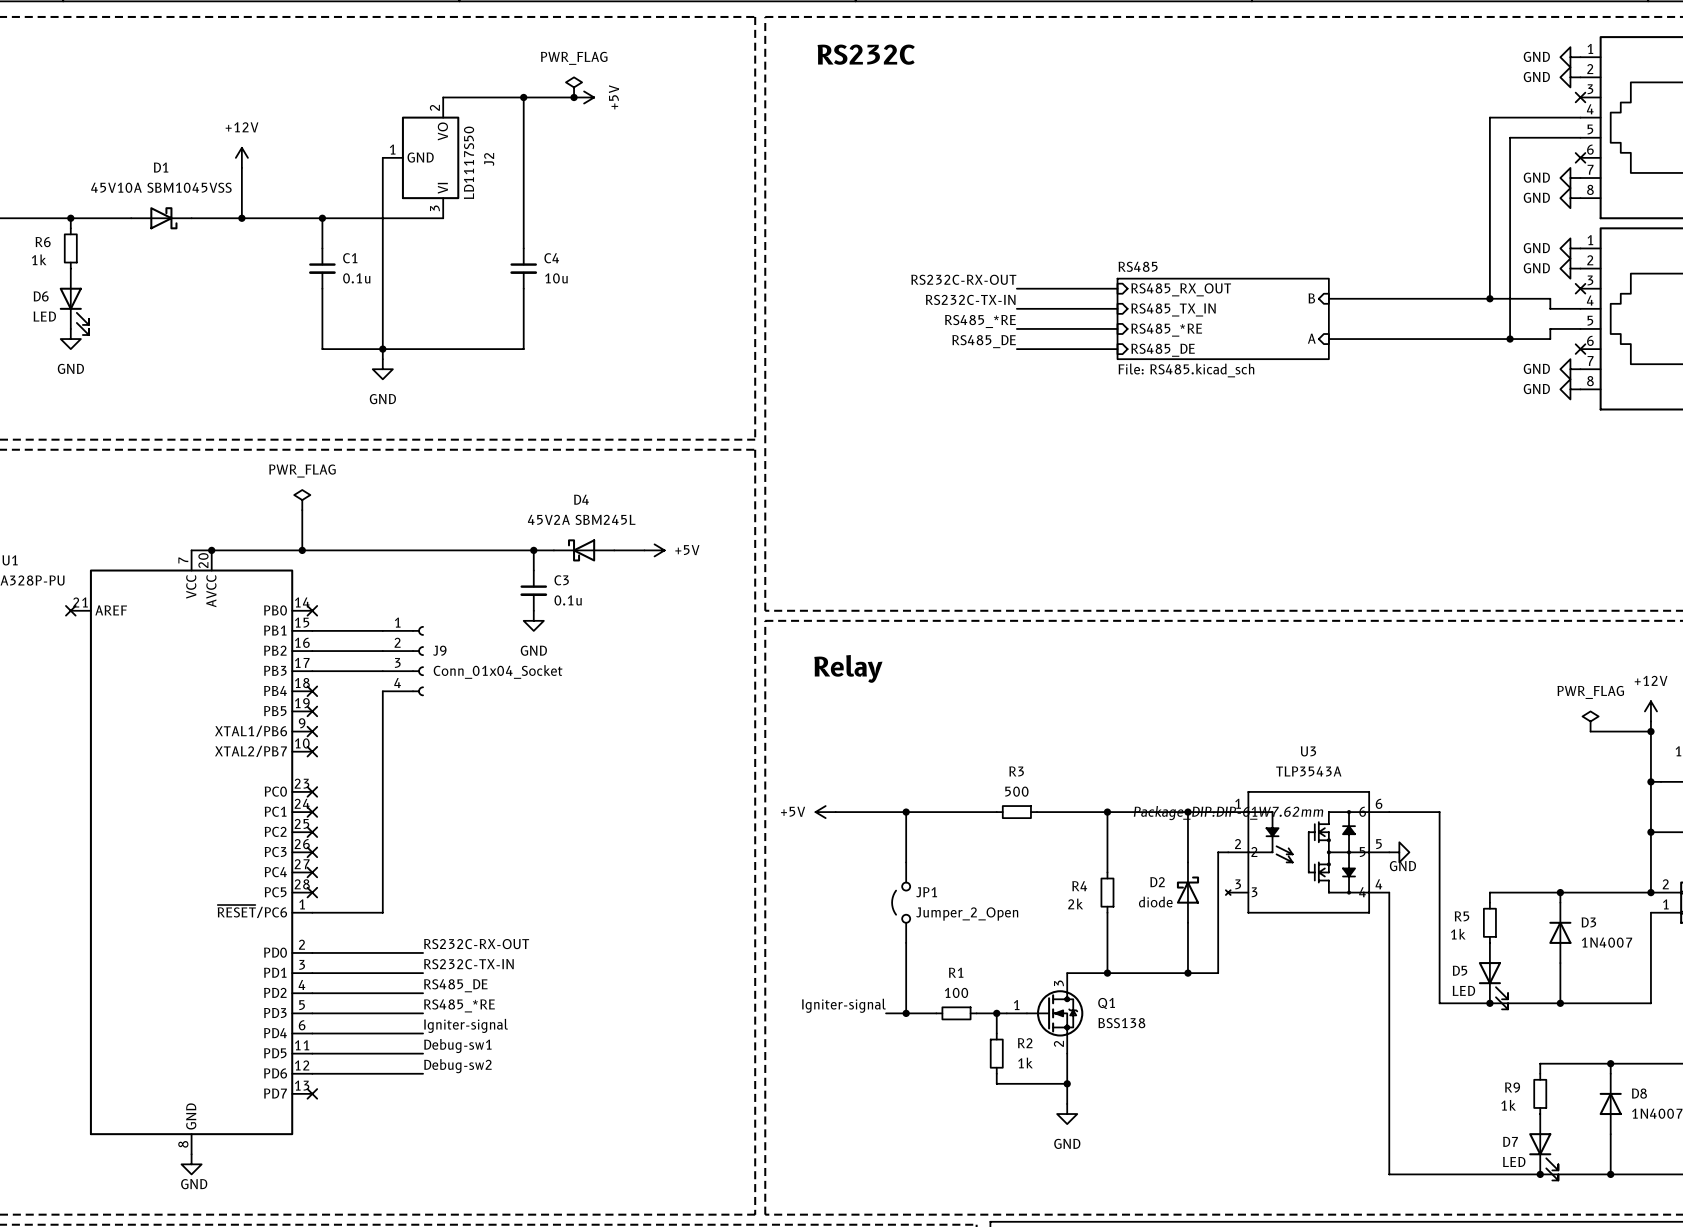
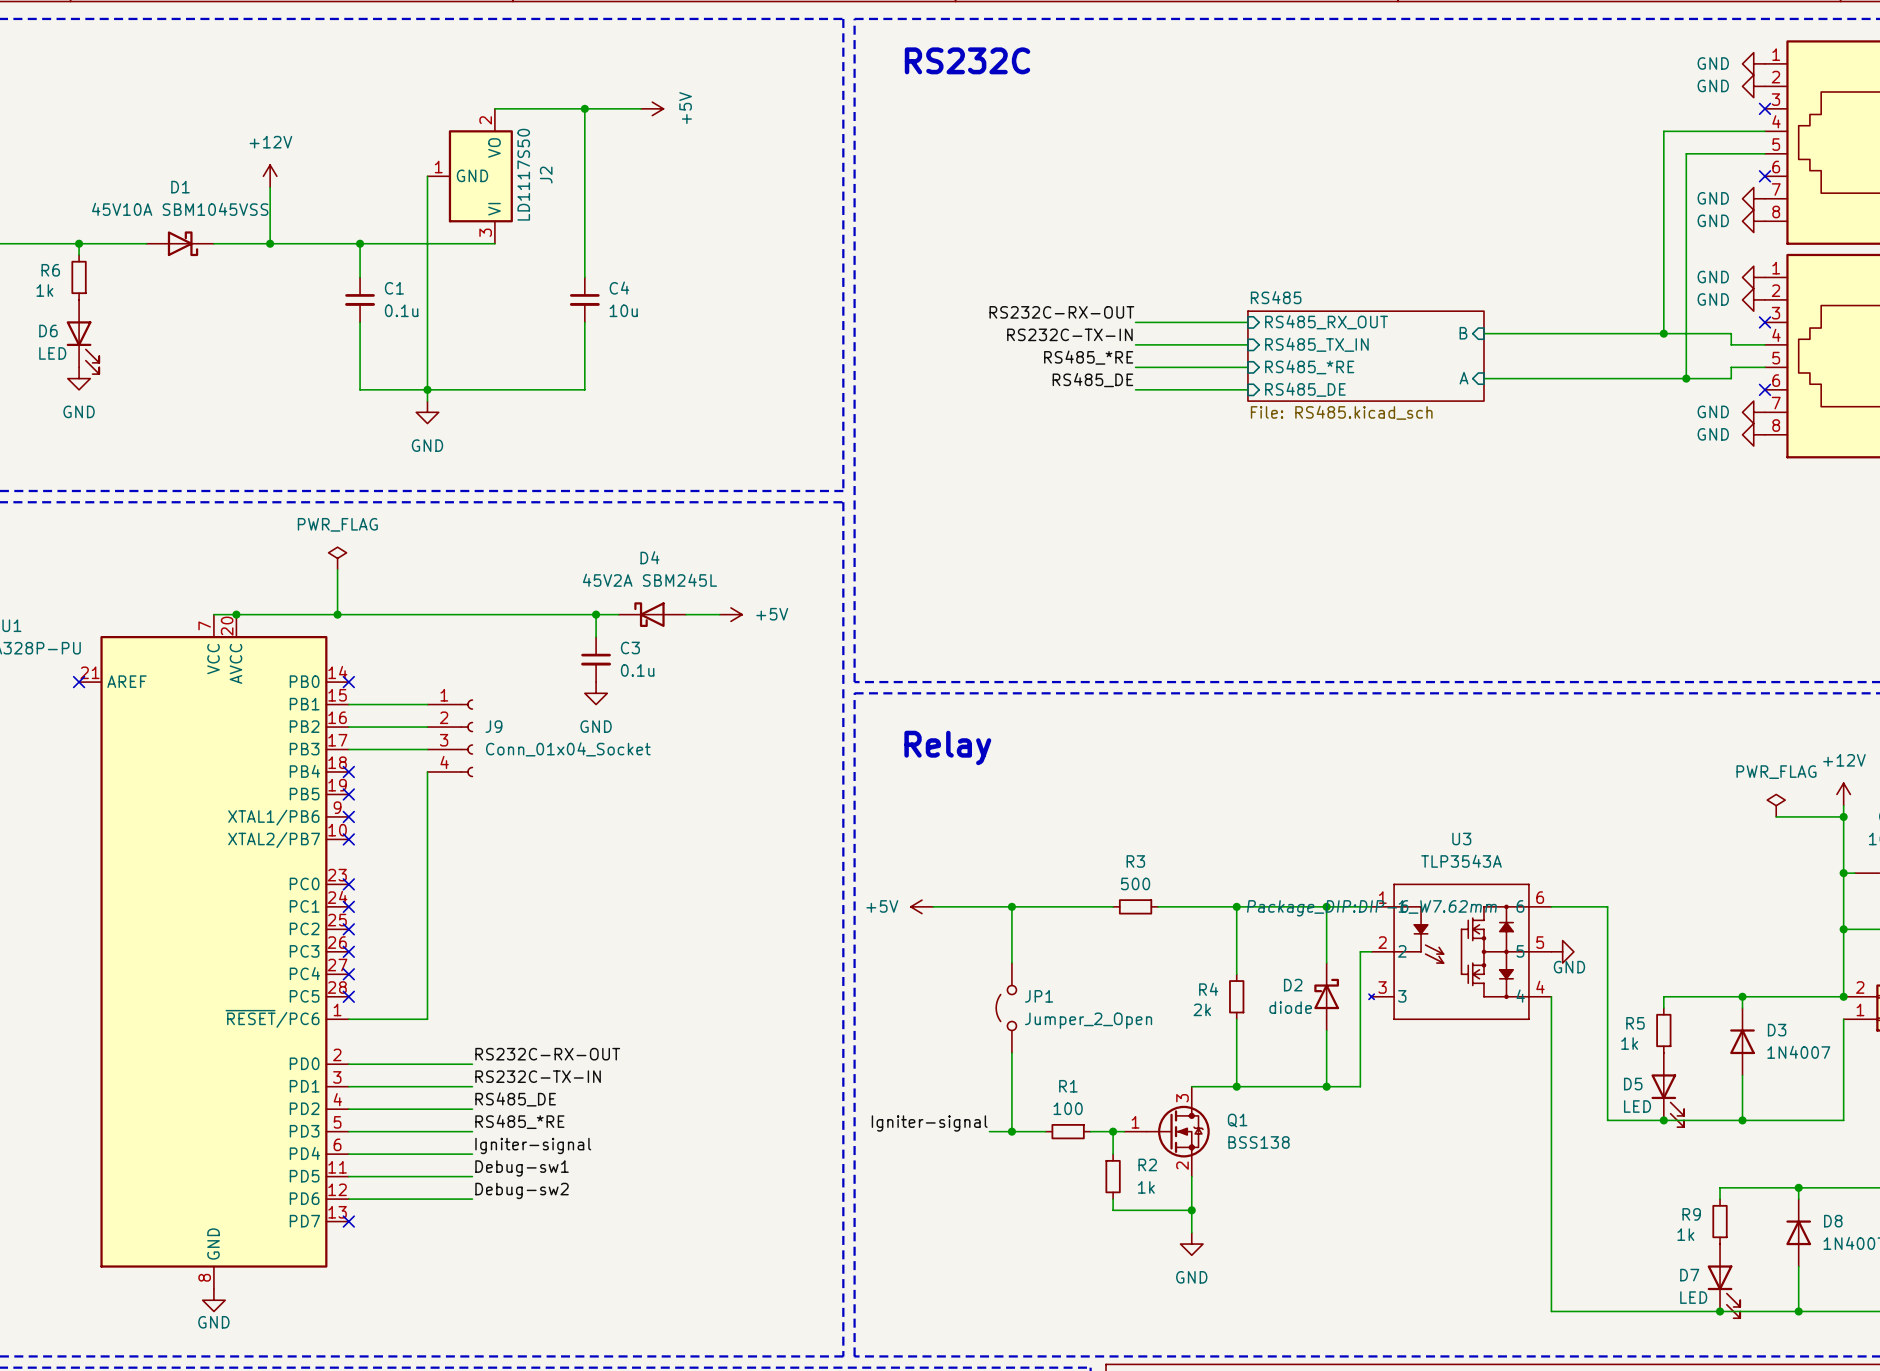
power symbol: PWR_FLAG (574, 87) -> none
junction: (574, 97) -> none

